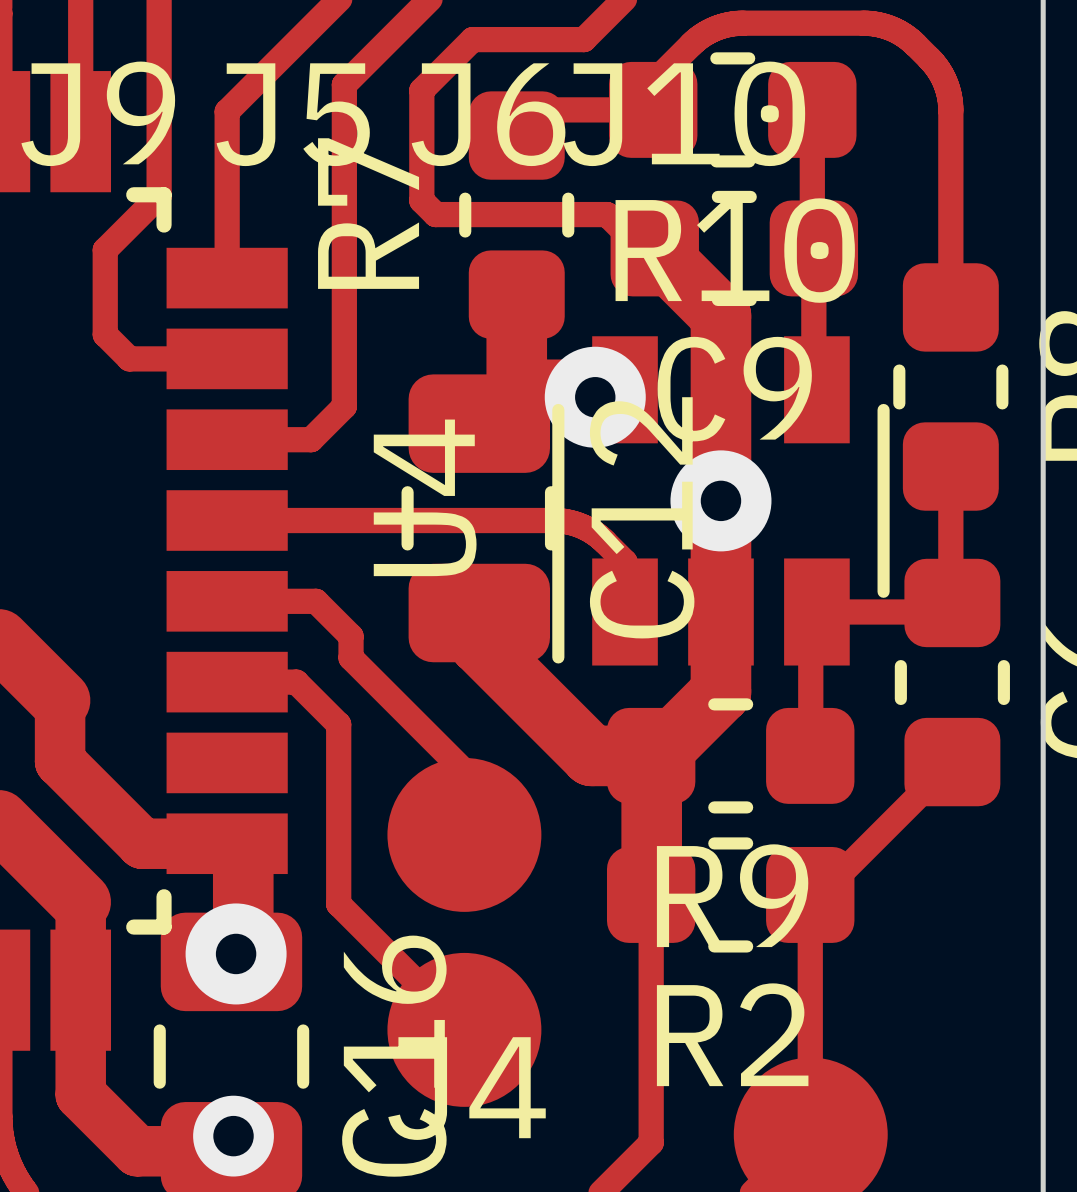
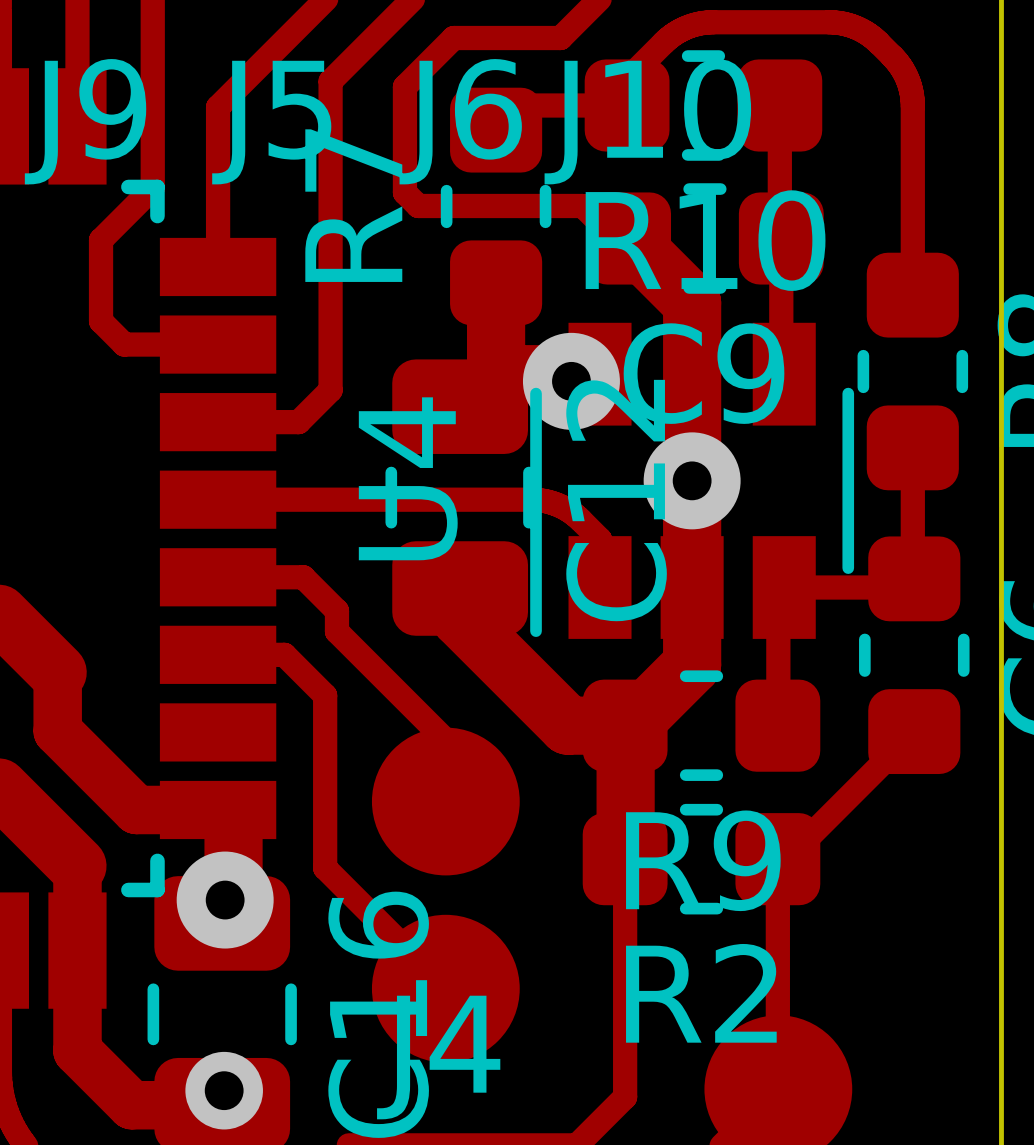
via position: (236, 953) -> (225, 900)

